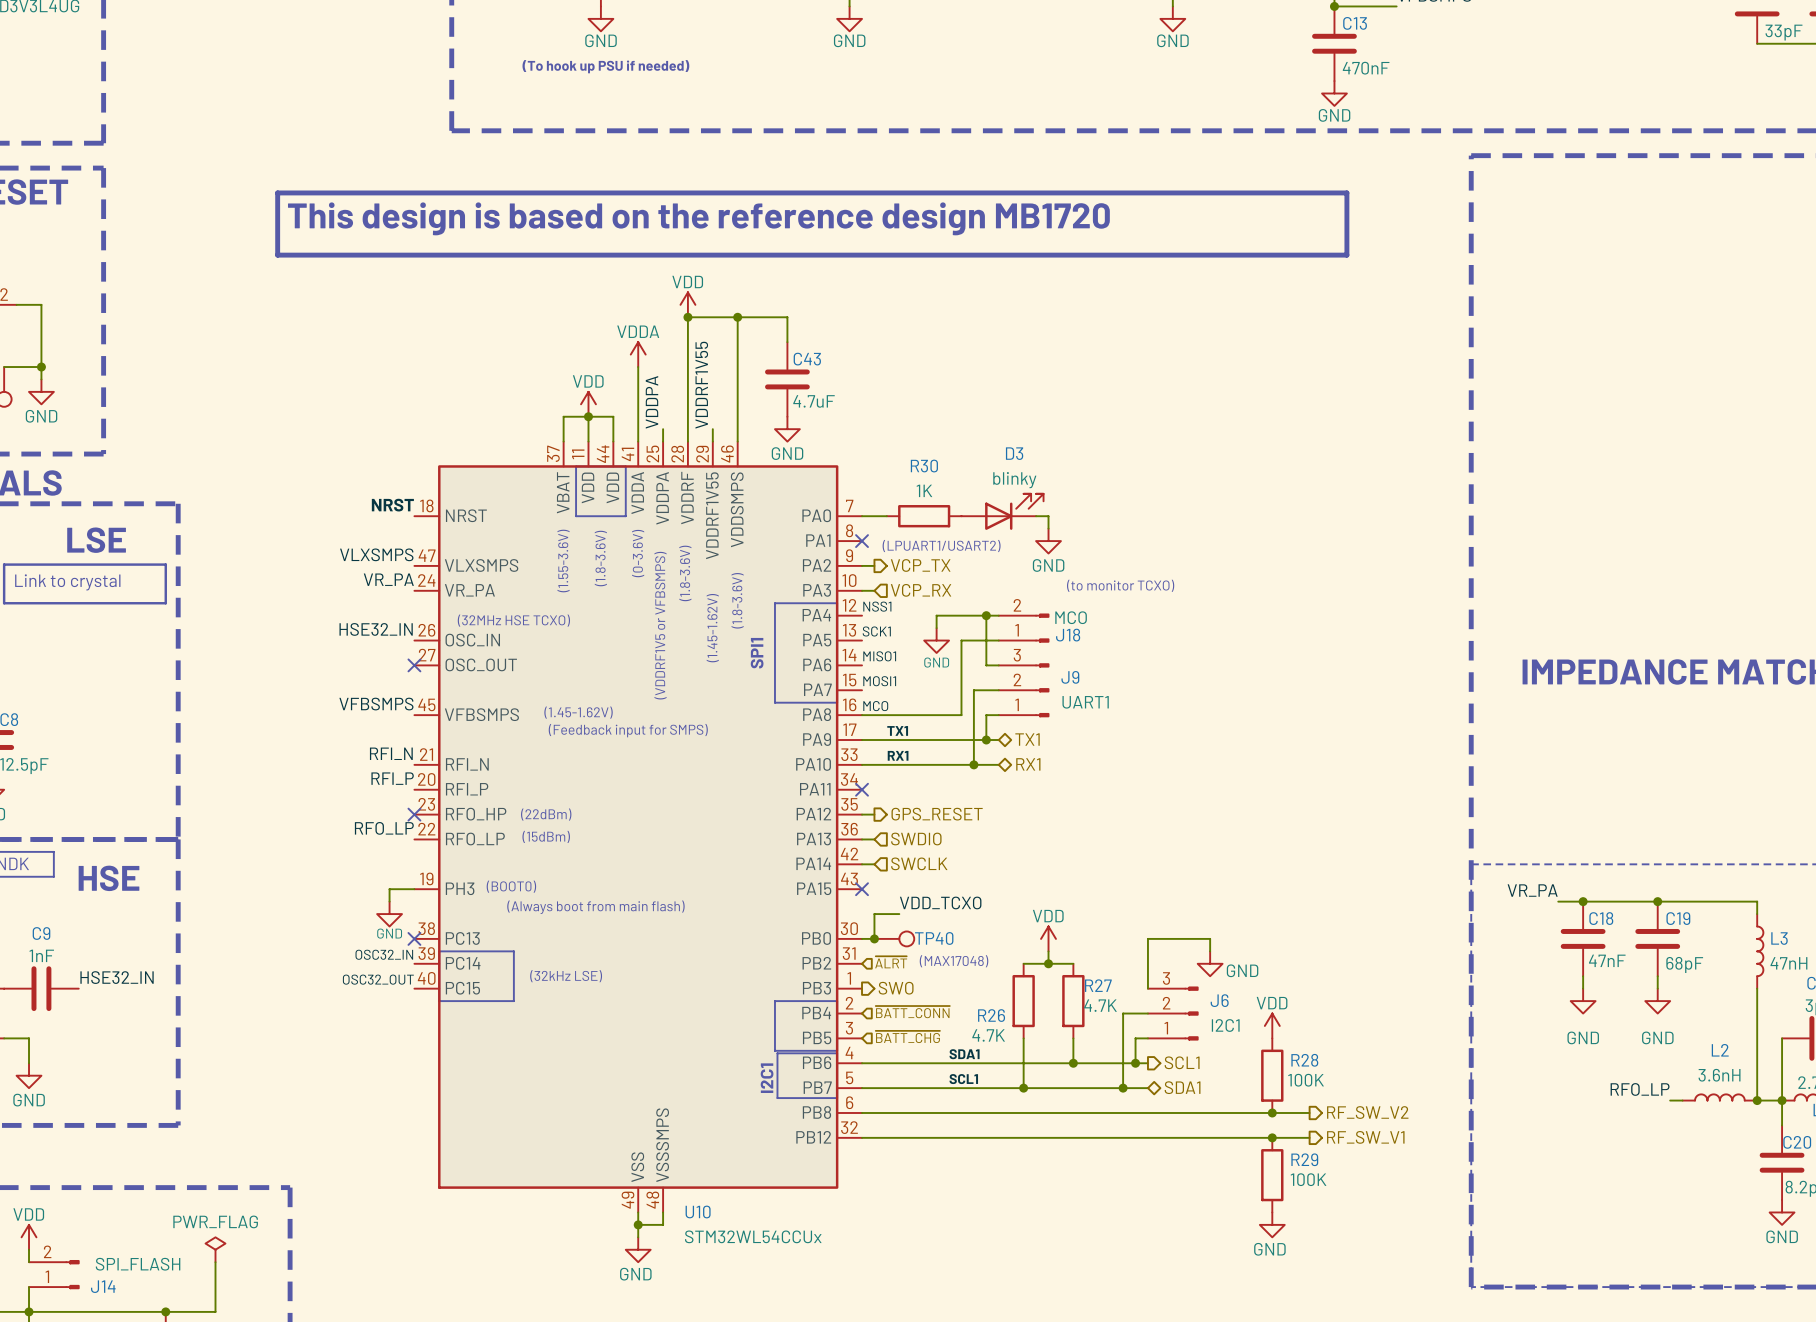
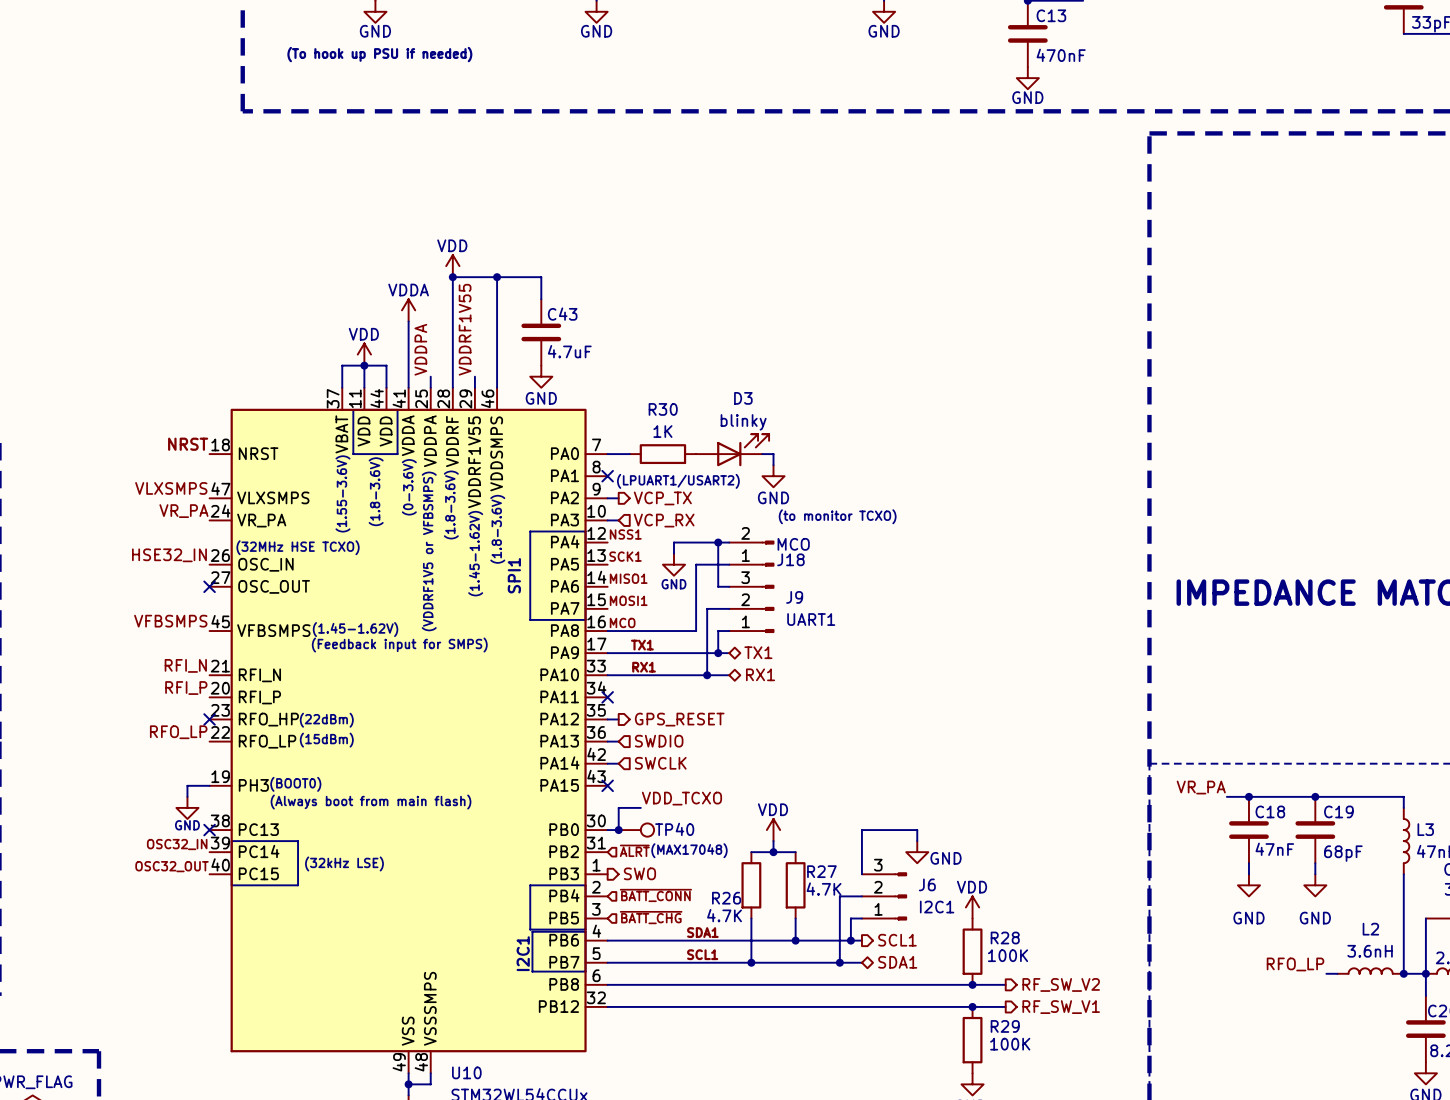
line: (277, 192) (1346, 192) (1346, 255) (277, 255) (277, 192) -> none
text: This design is based on the reference design MB1720 (698, 218) -> none

